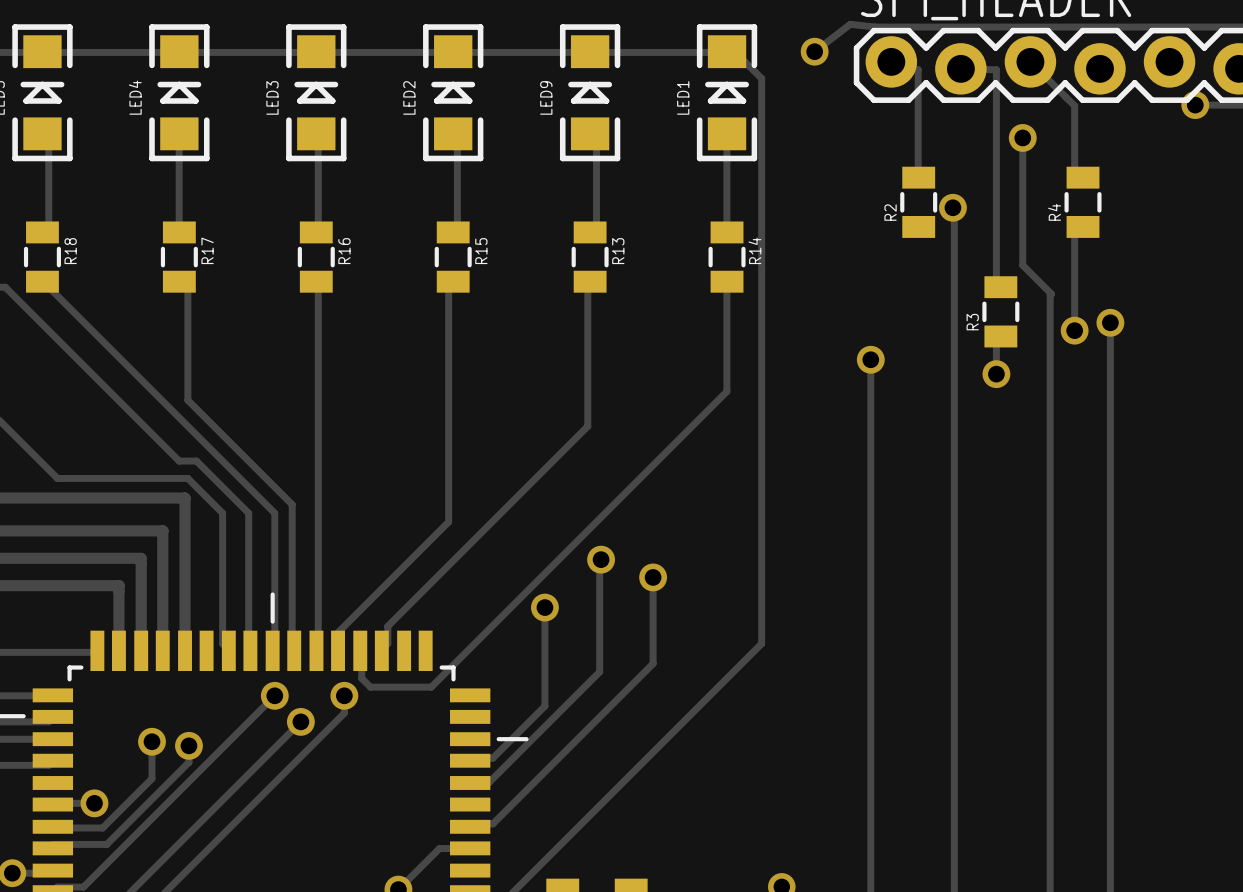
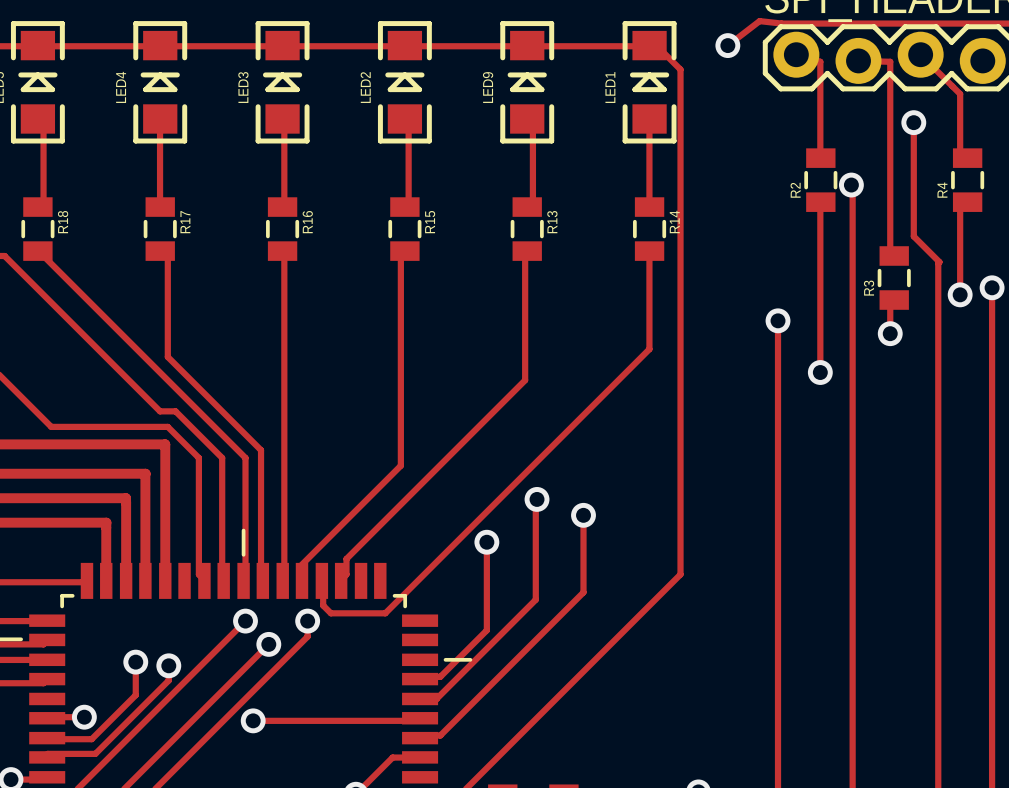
track: none -> (820, 202) (820, 372)
via: none -> (820, 372)
track: none -> (420, 718) (418, 720) (253, 720)
via: none -> (253, 720)

